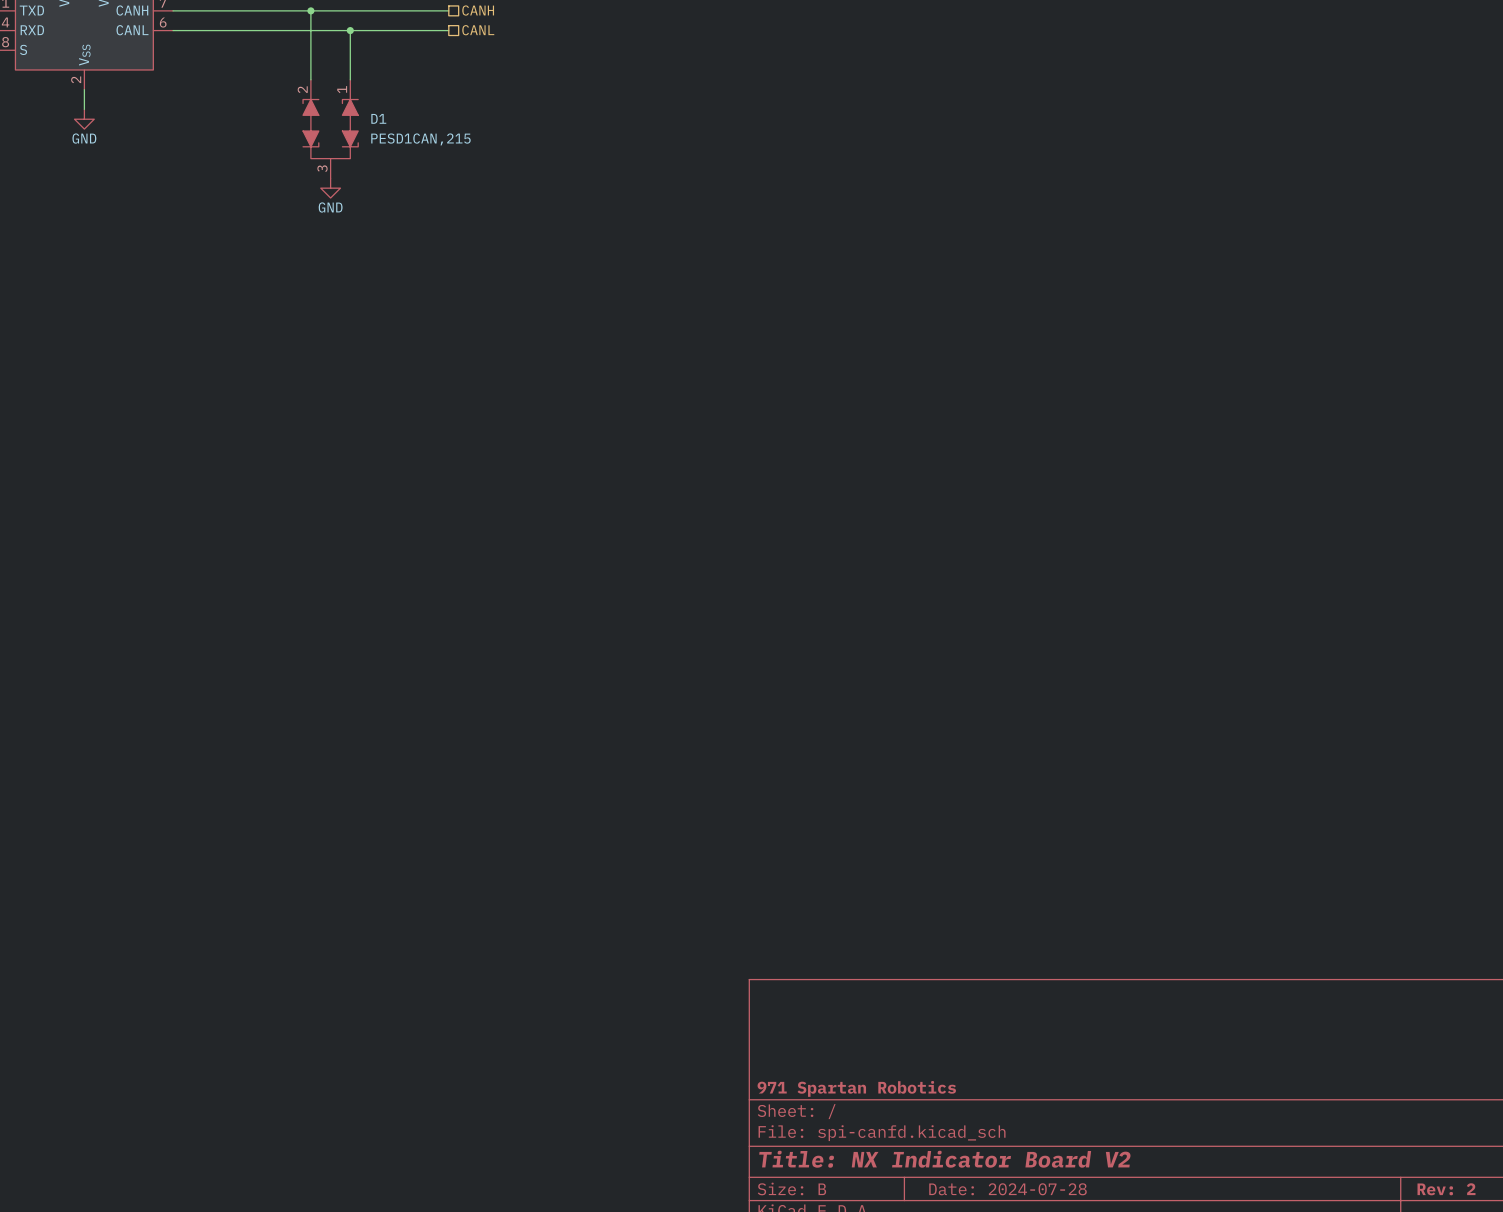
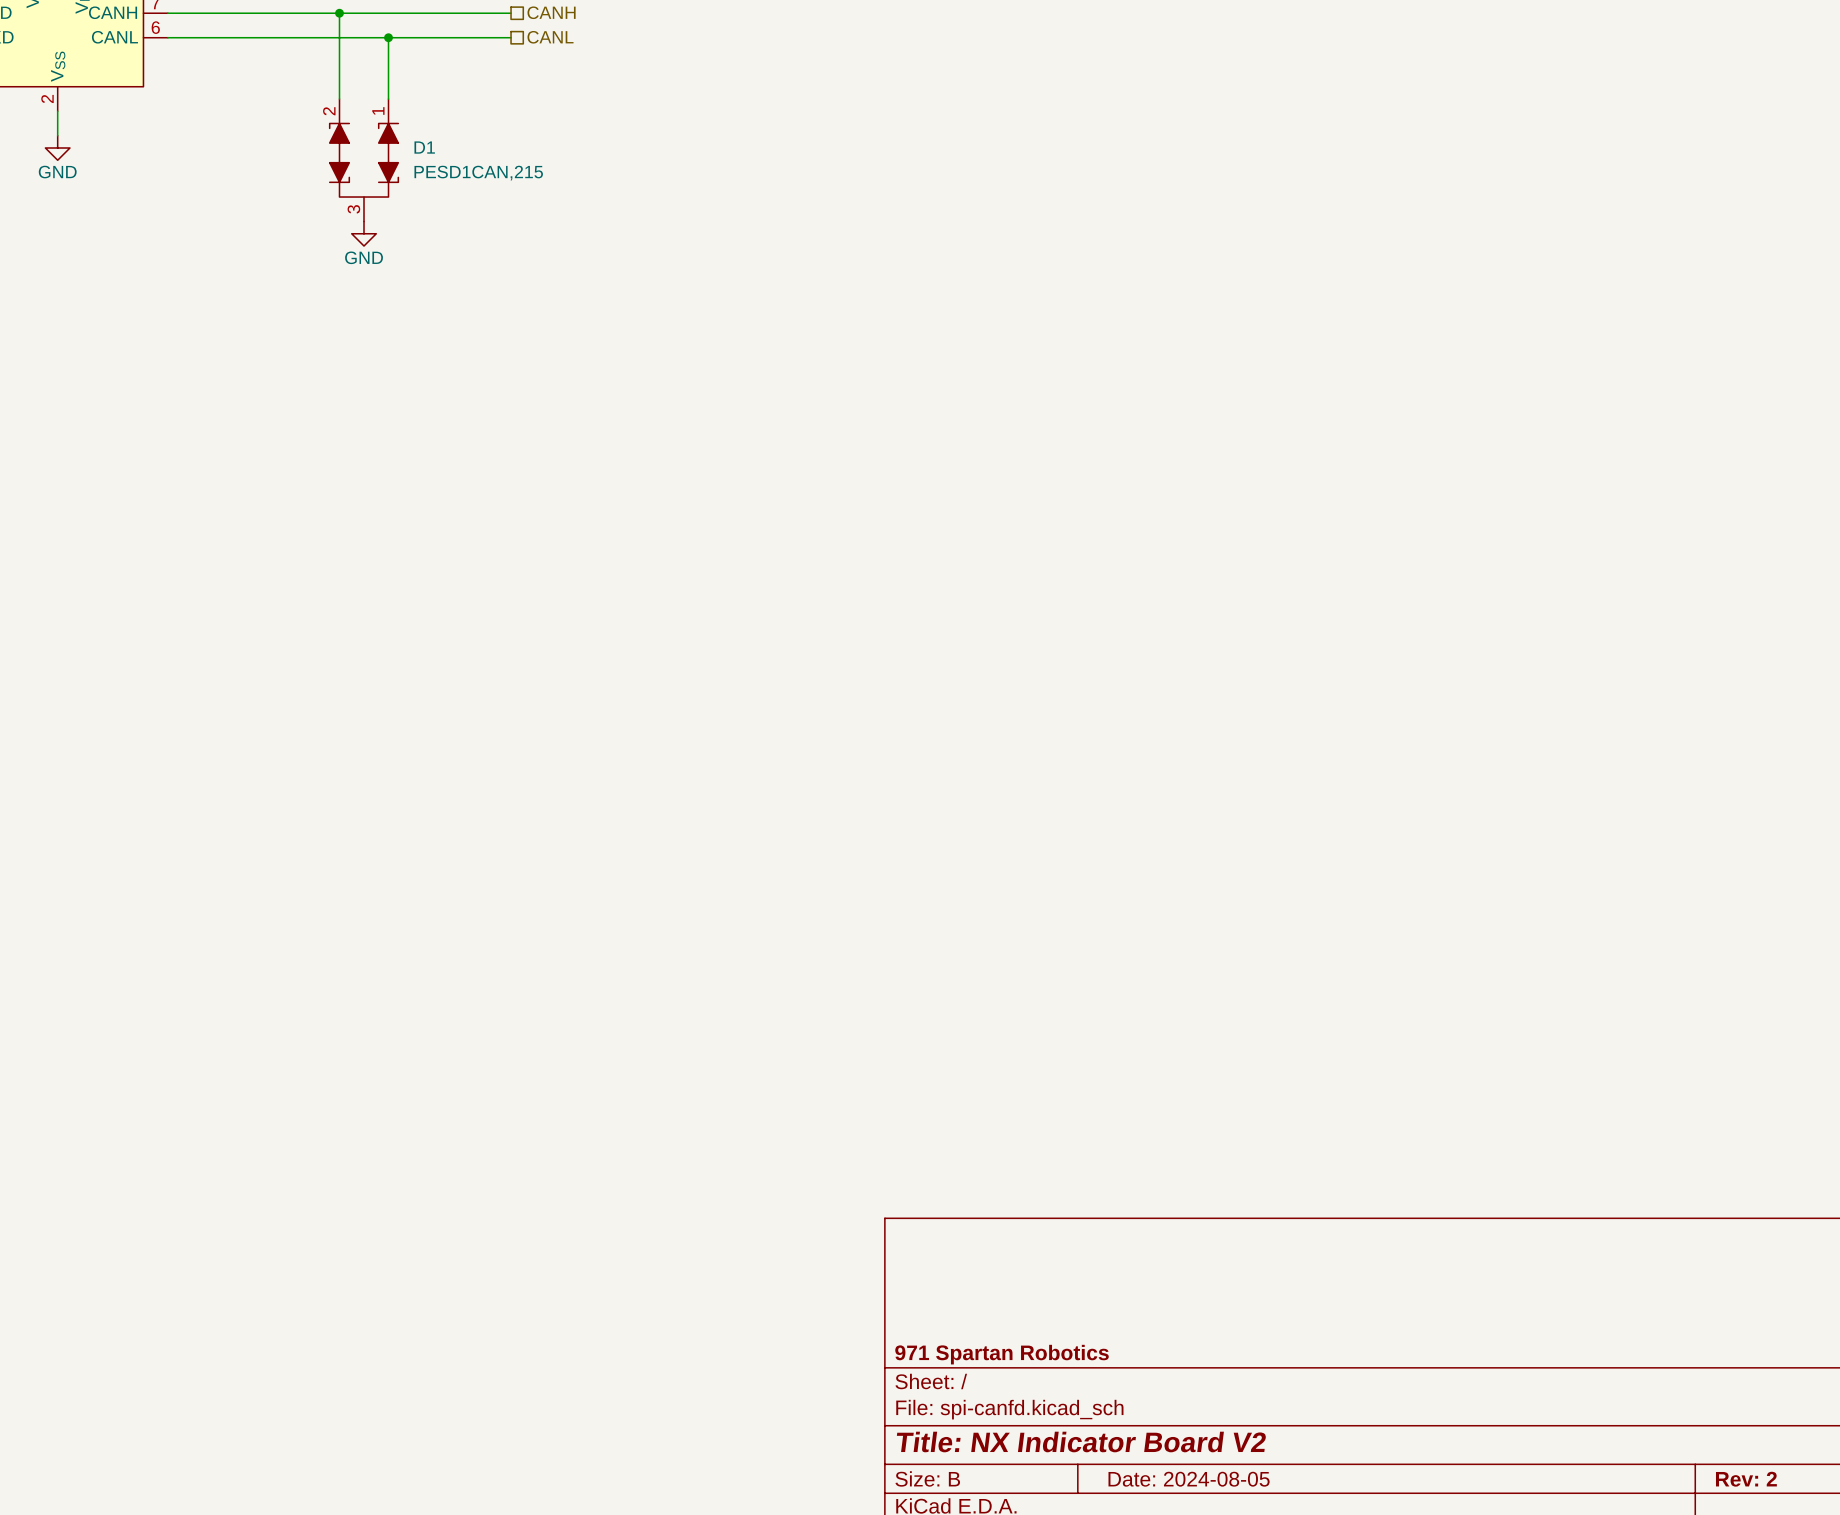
title block: Date: 2024-07-28 (1008, 1189) -> Date: 2024-08-05 (1189, 1479)

